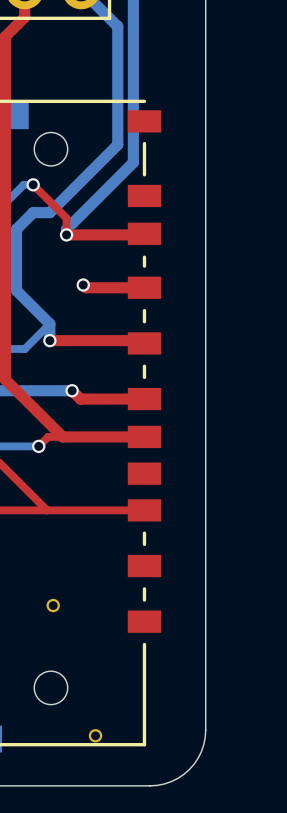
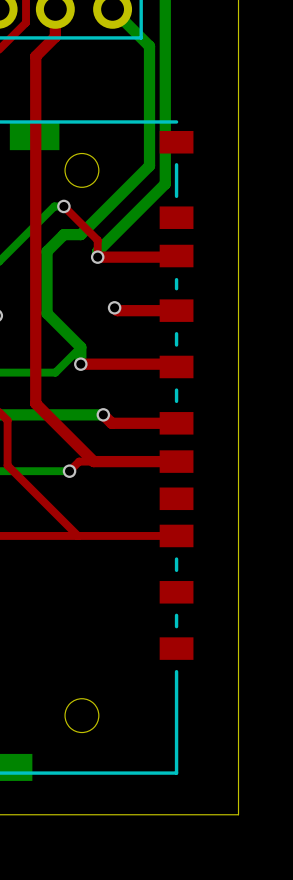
part: (53, 605) -> none
board edge: (205, 730) (201, 751) (189, 769) (171, 781) (150, 785) -> (238, 758) (238, 814) (182, 814)
part: (95, 735) -> none

